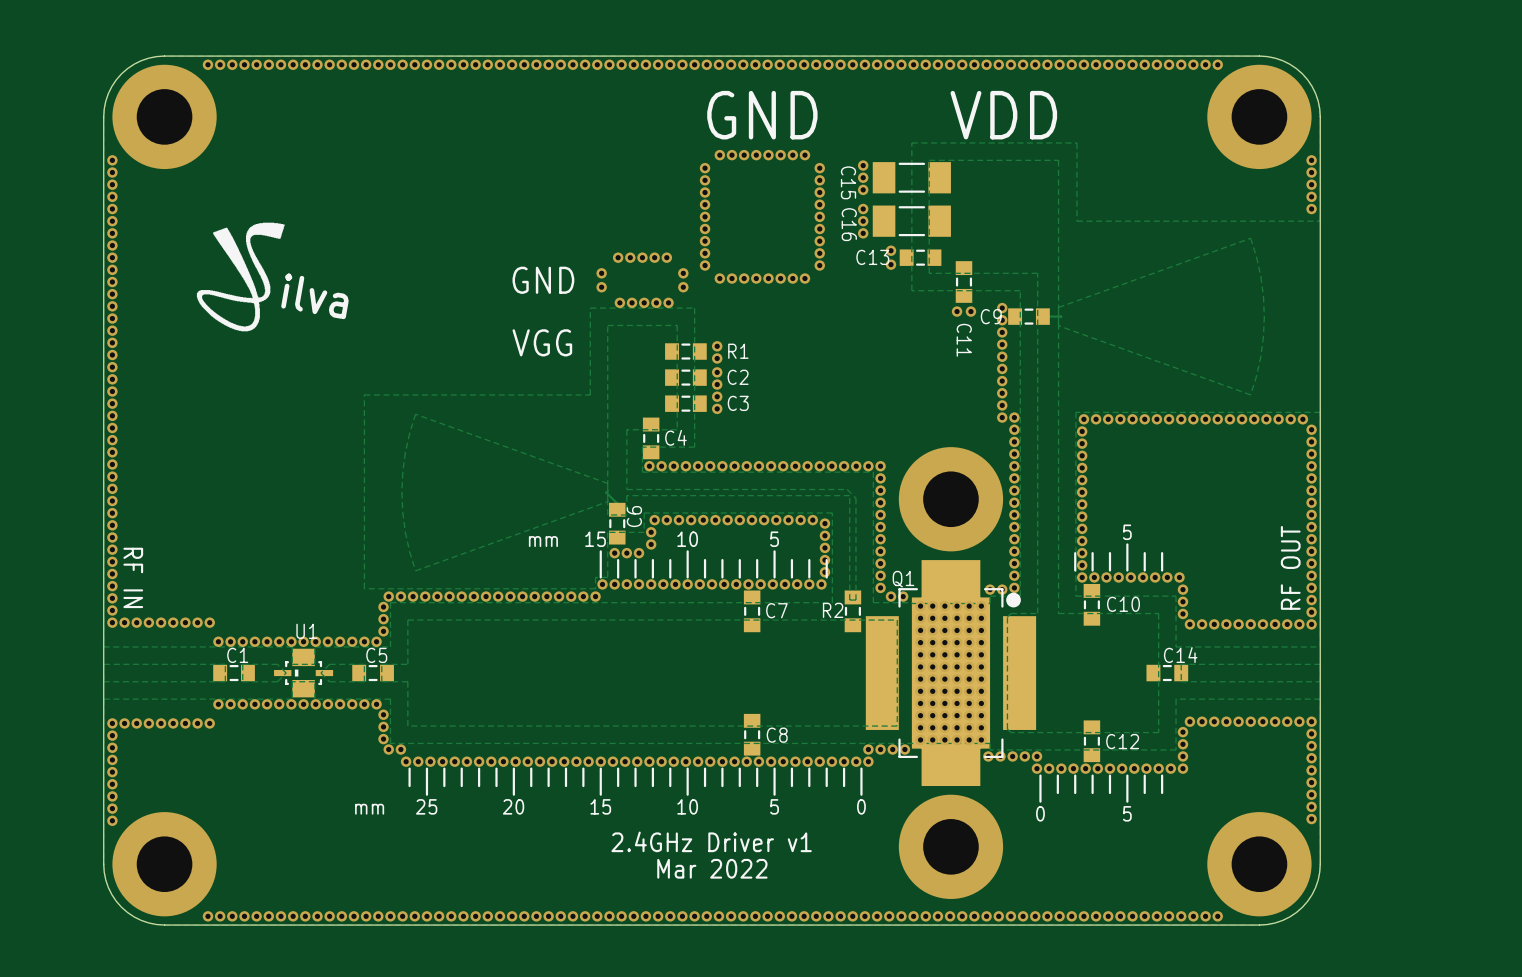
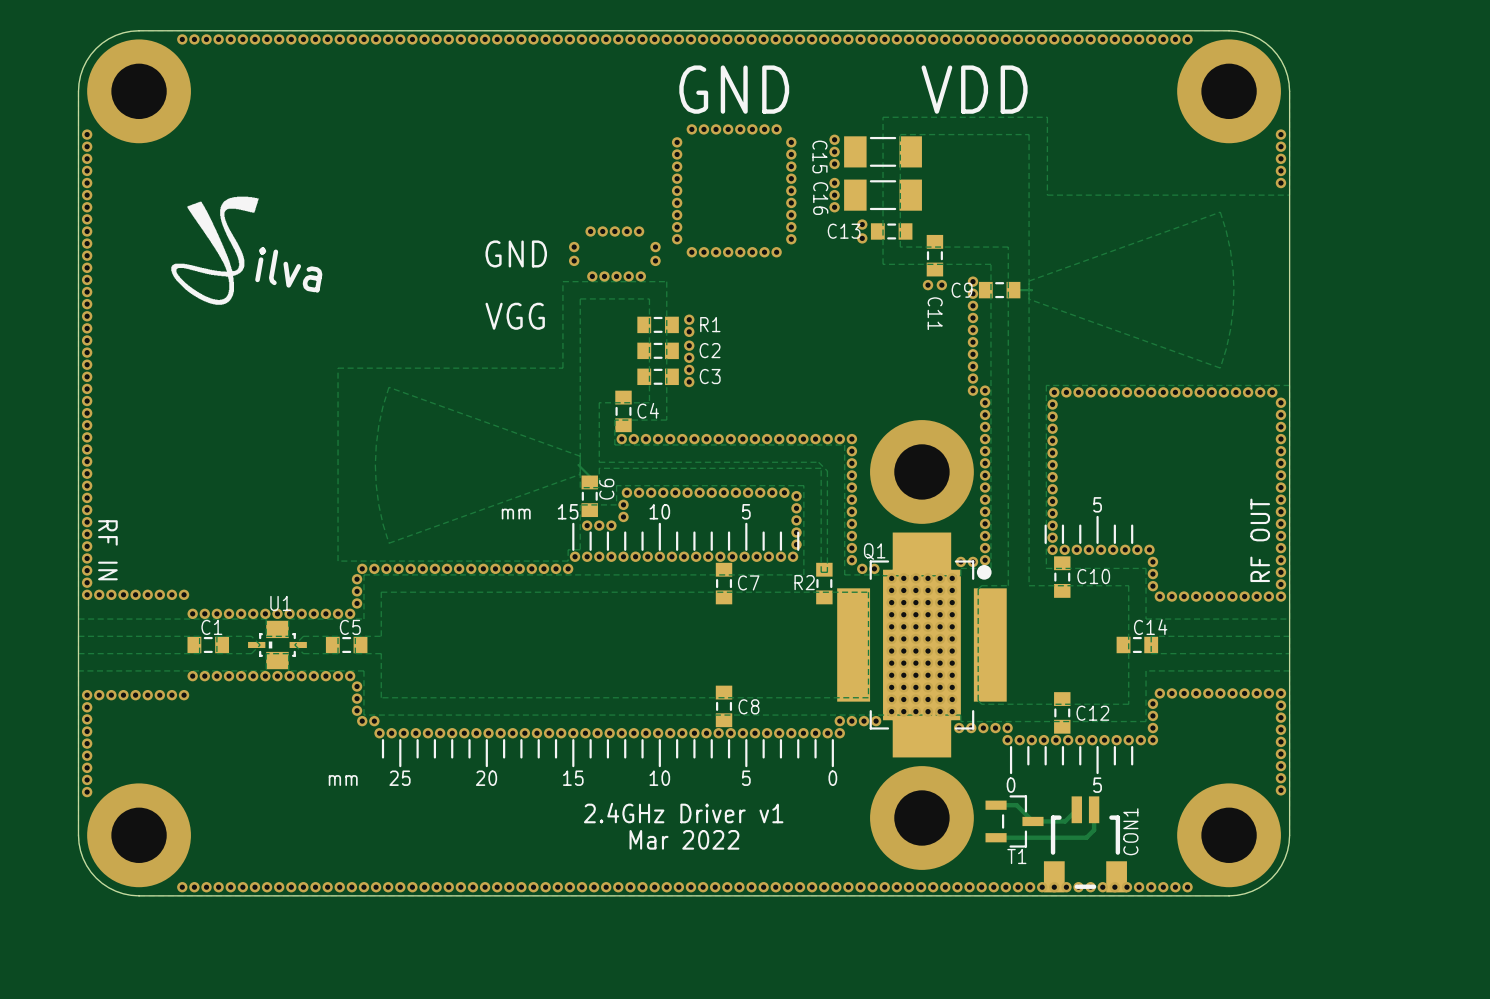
track: none -> (996, 805) (1016, 805) (1032, 821) (1065, 821) (1076, 809)
track: none -> (1094, 809) (1094, 830) (1086, 837) (996, 837)
T1: none -> (1014, 821)
CON1: none -> (1085, 844)

